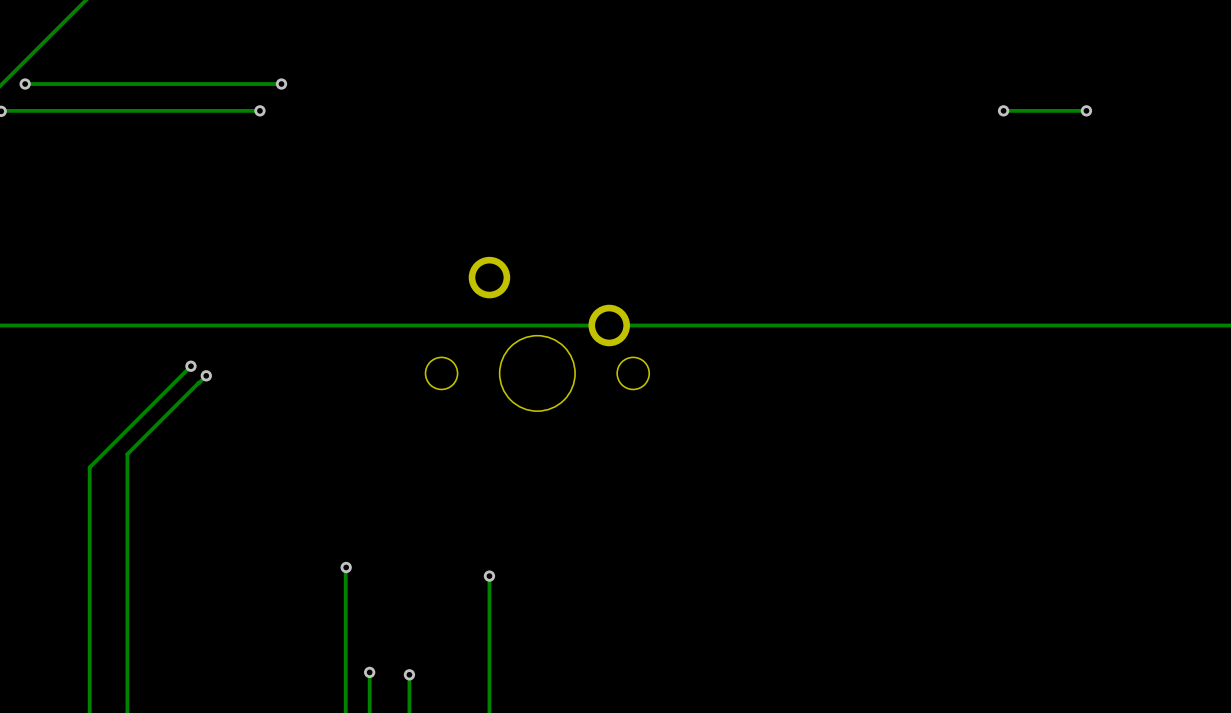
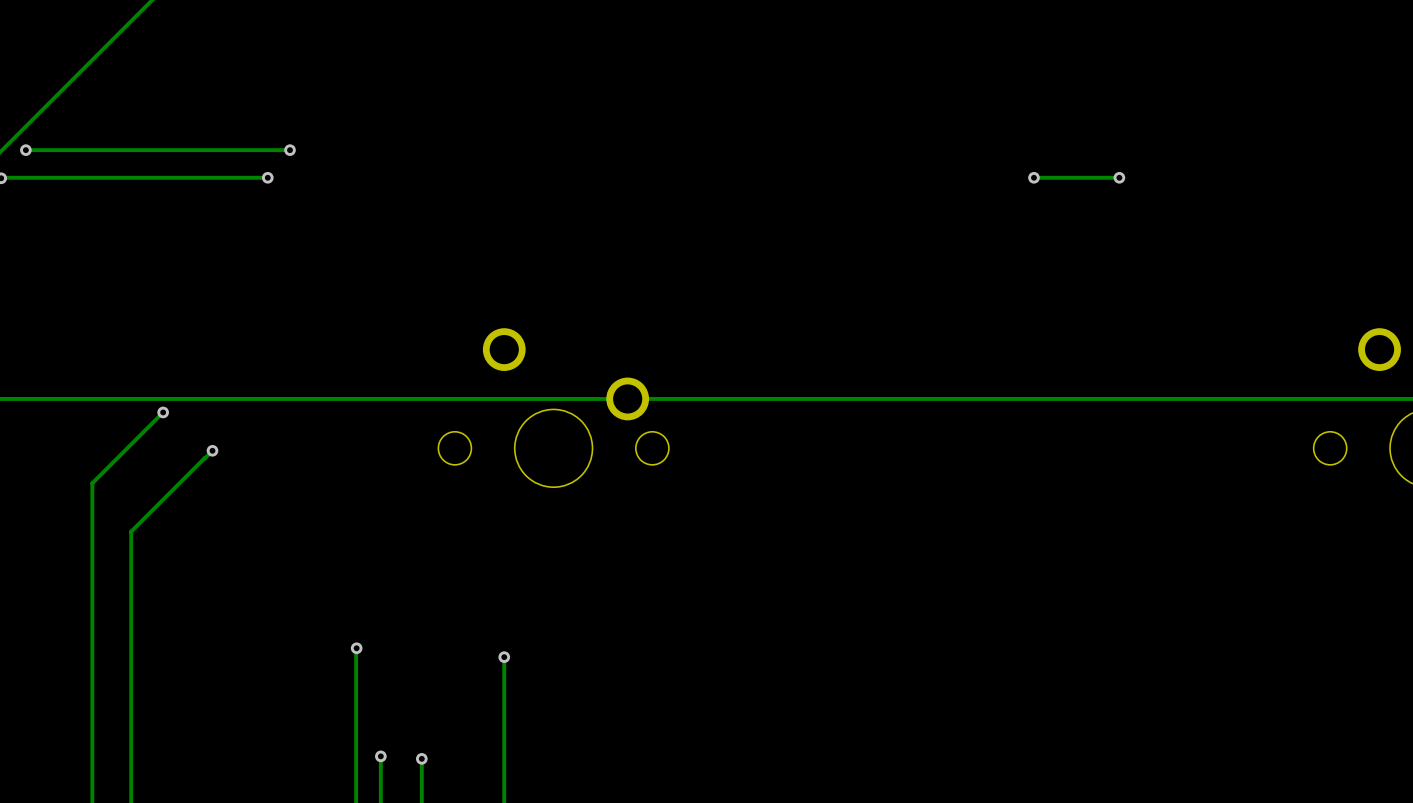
track: (190, 366) (89, 467) -> (163, 412) (92, 483) (92, 545)
via position: (190, 366) -> (163, 412)

